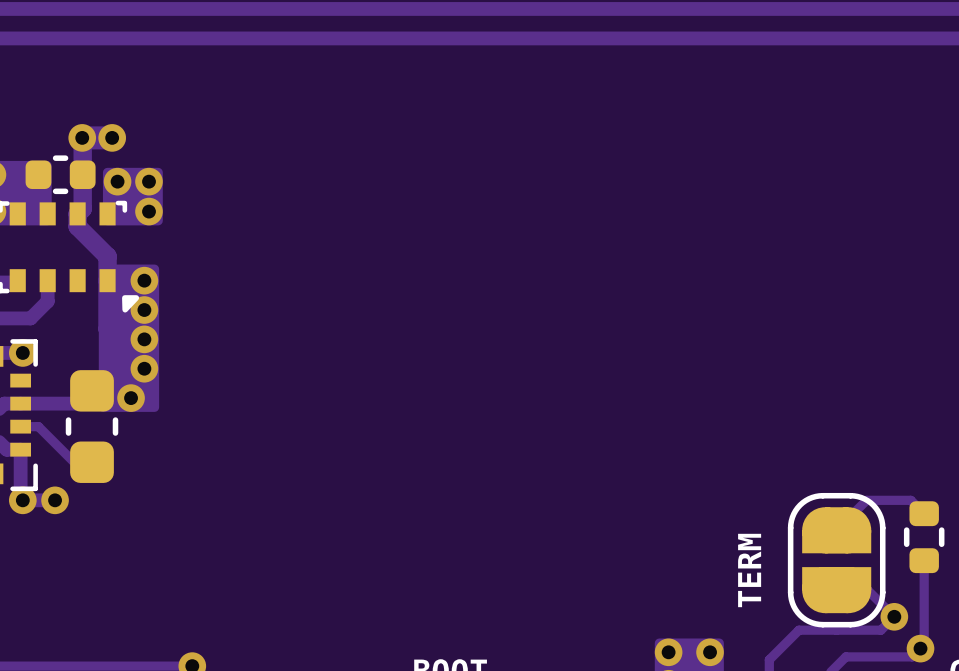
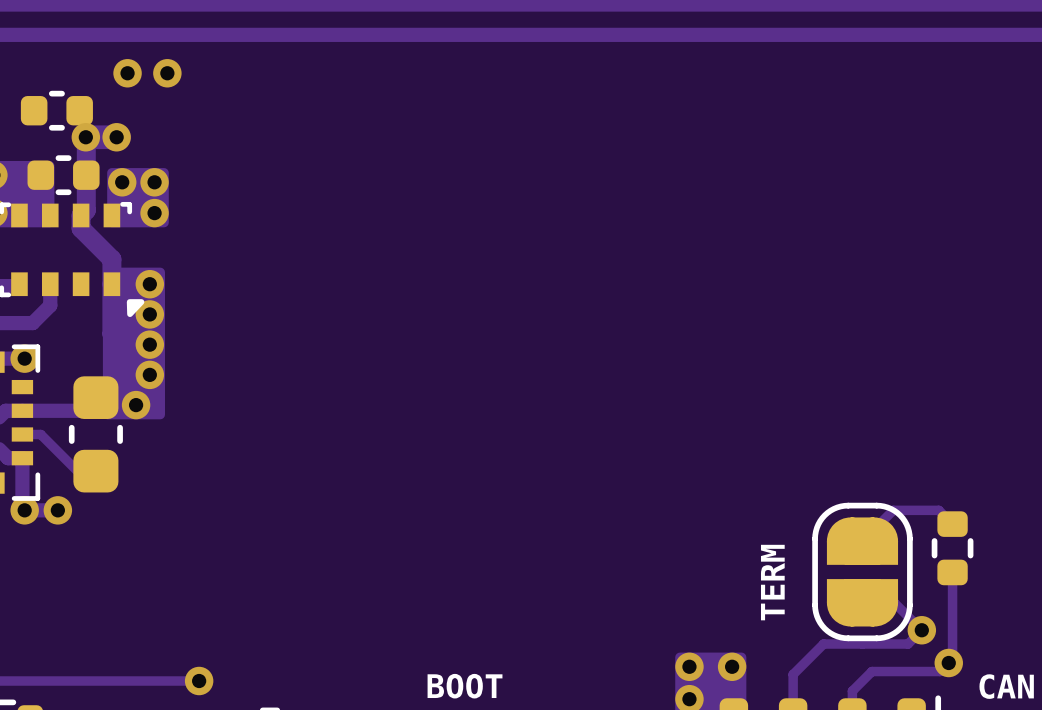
via: none -> (127, 73)
via: none -> (167, 73)
part: none -> (56, 110)

